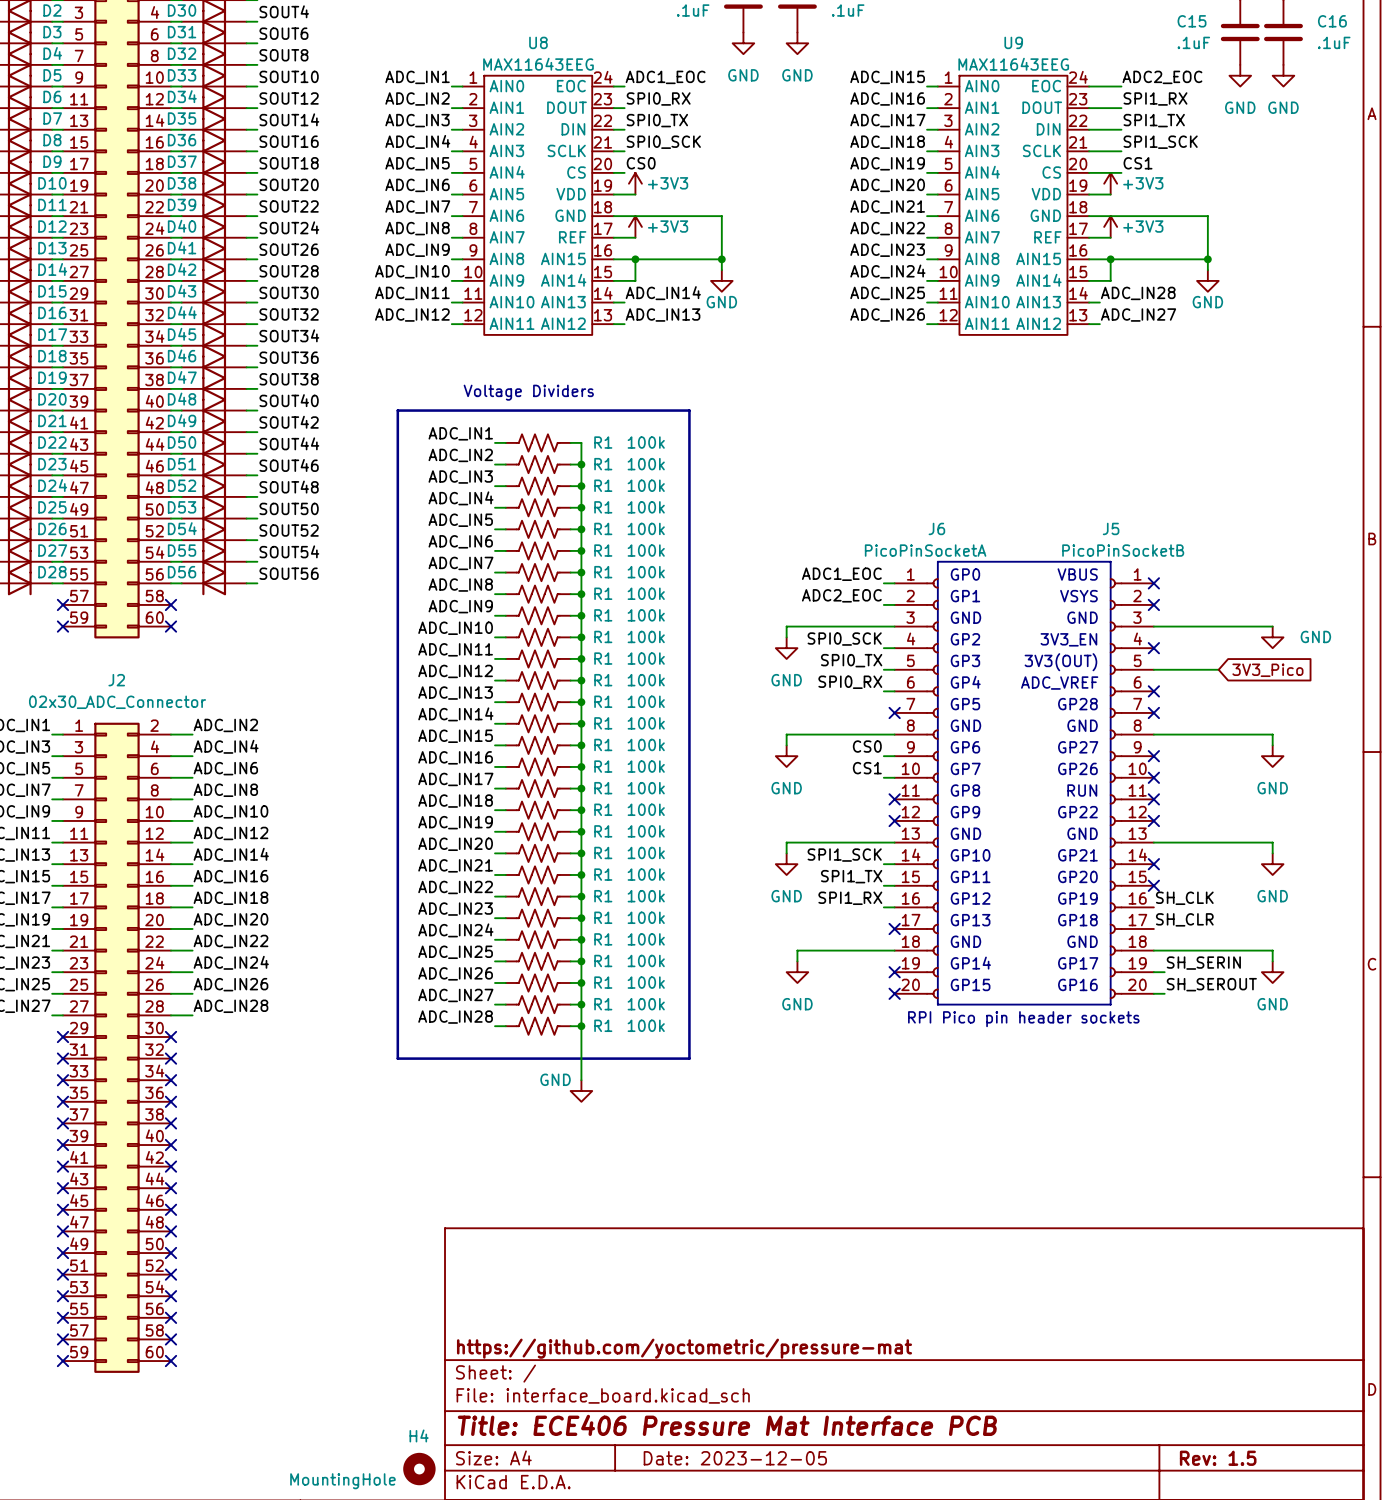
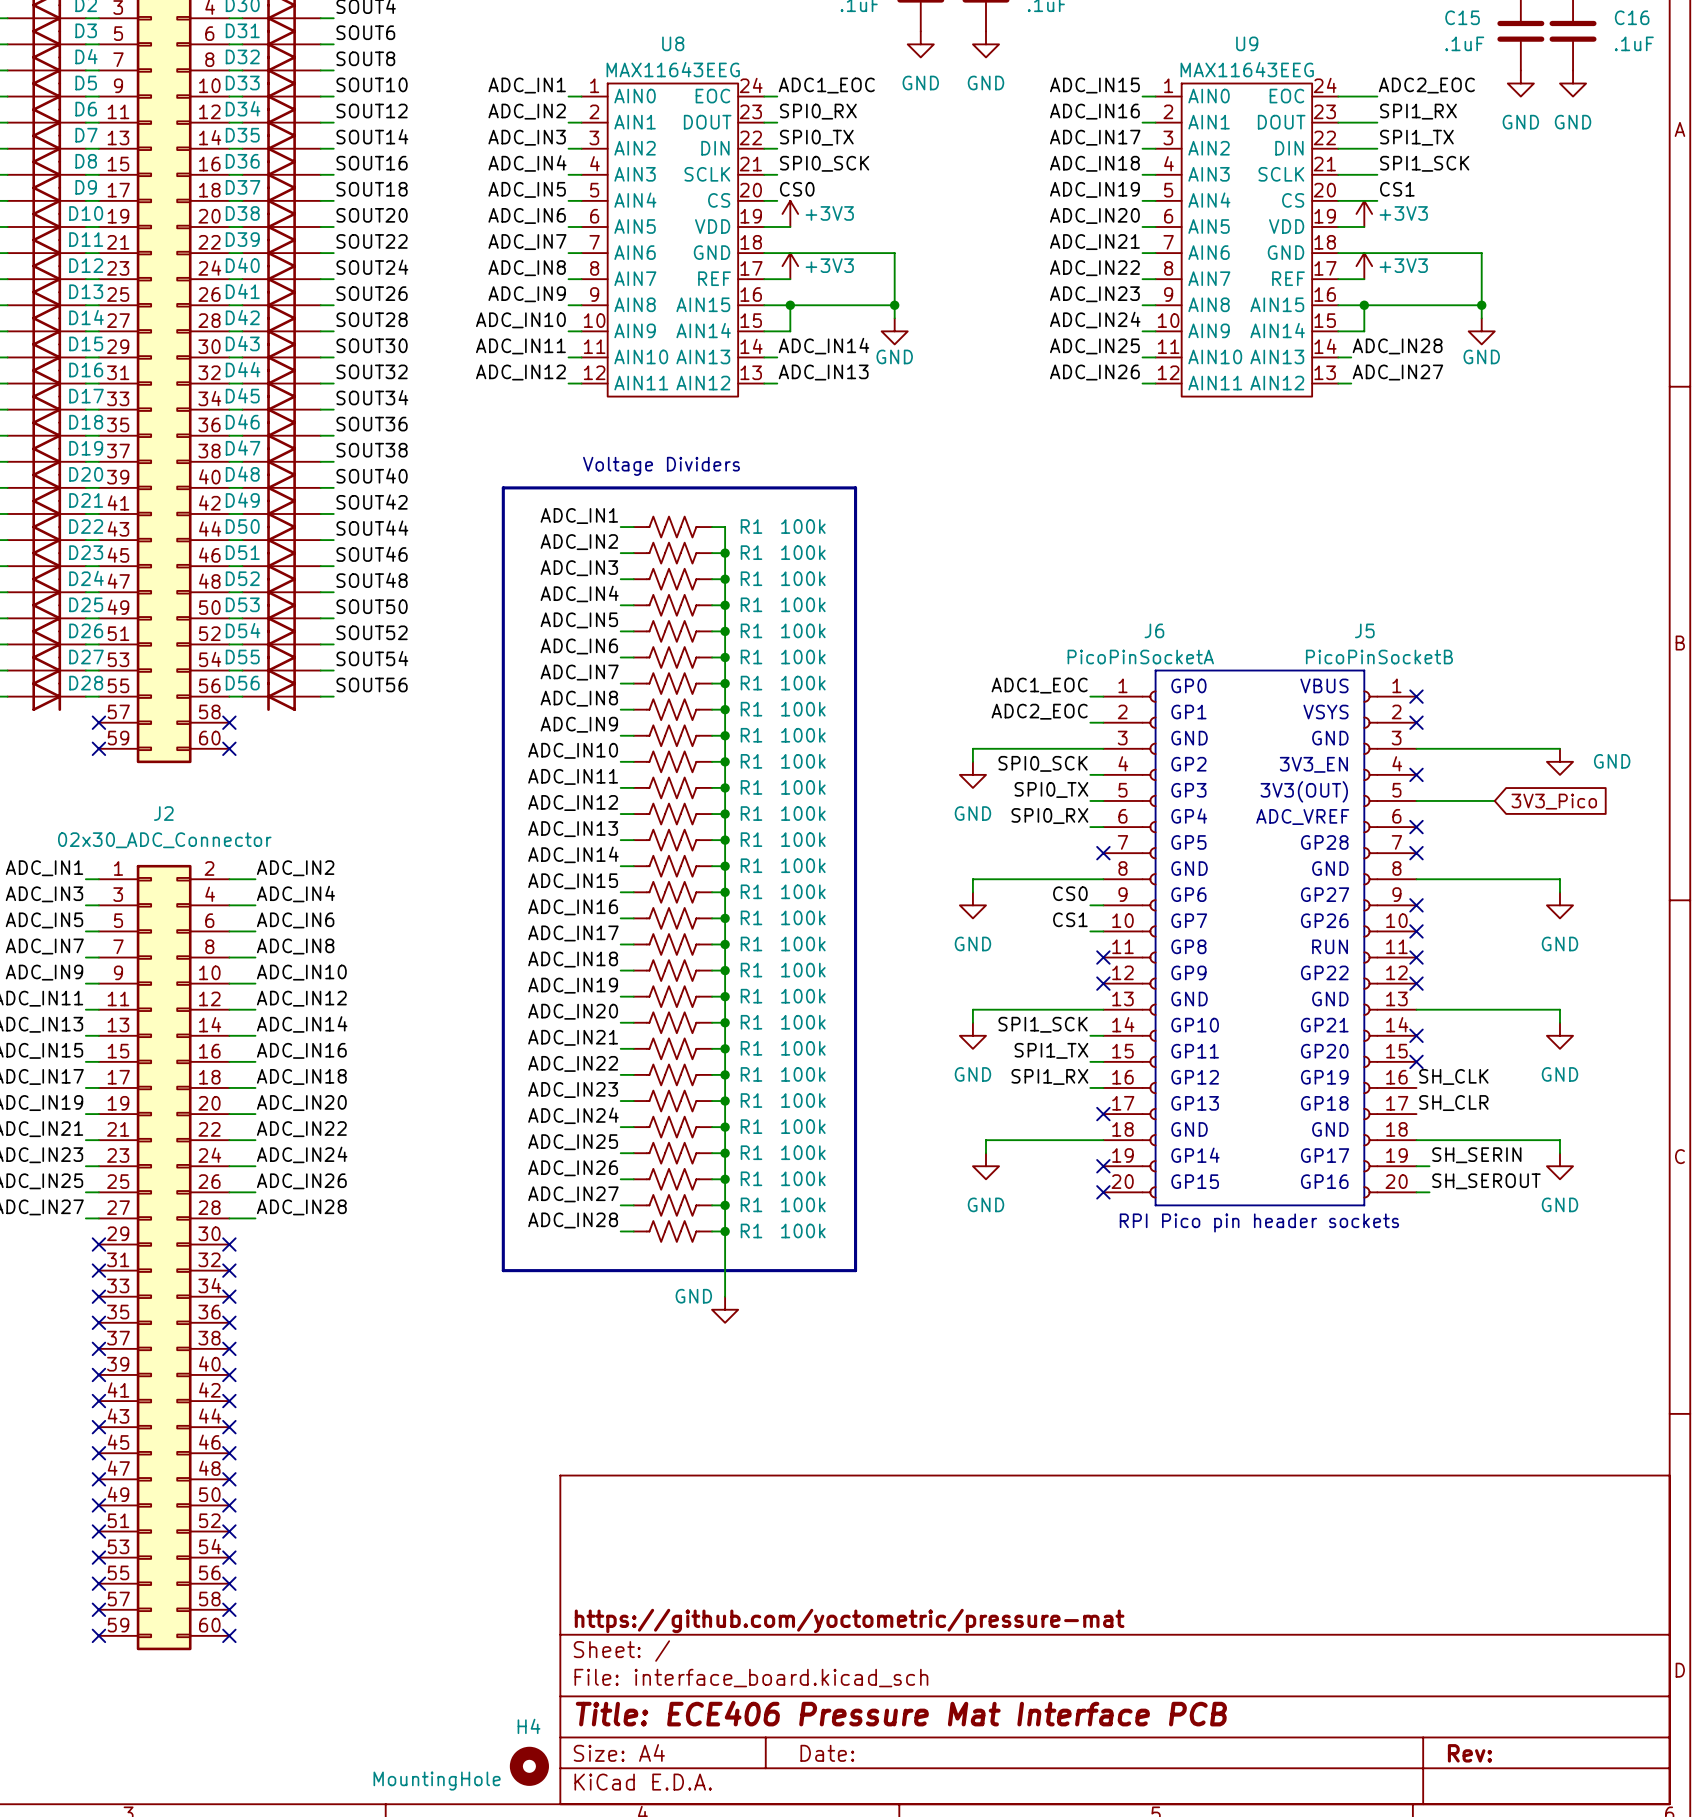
title block: Date: 2023-12-05 (735, 1458) -> Date: (827, 1753)
title block: Rev: 1.5 (1218, 1458) -> Rev: (1469, 1753)

